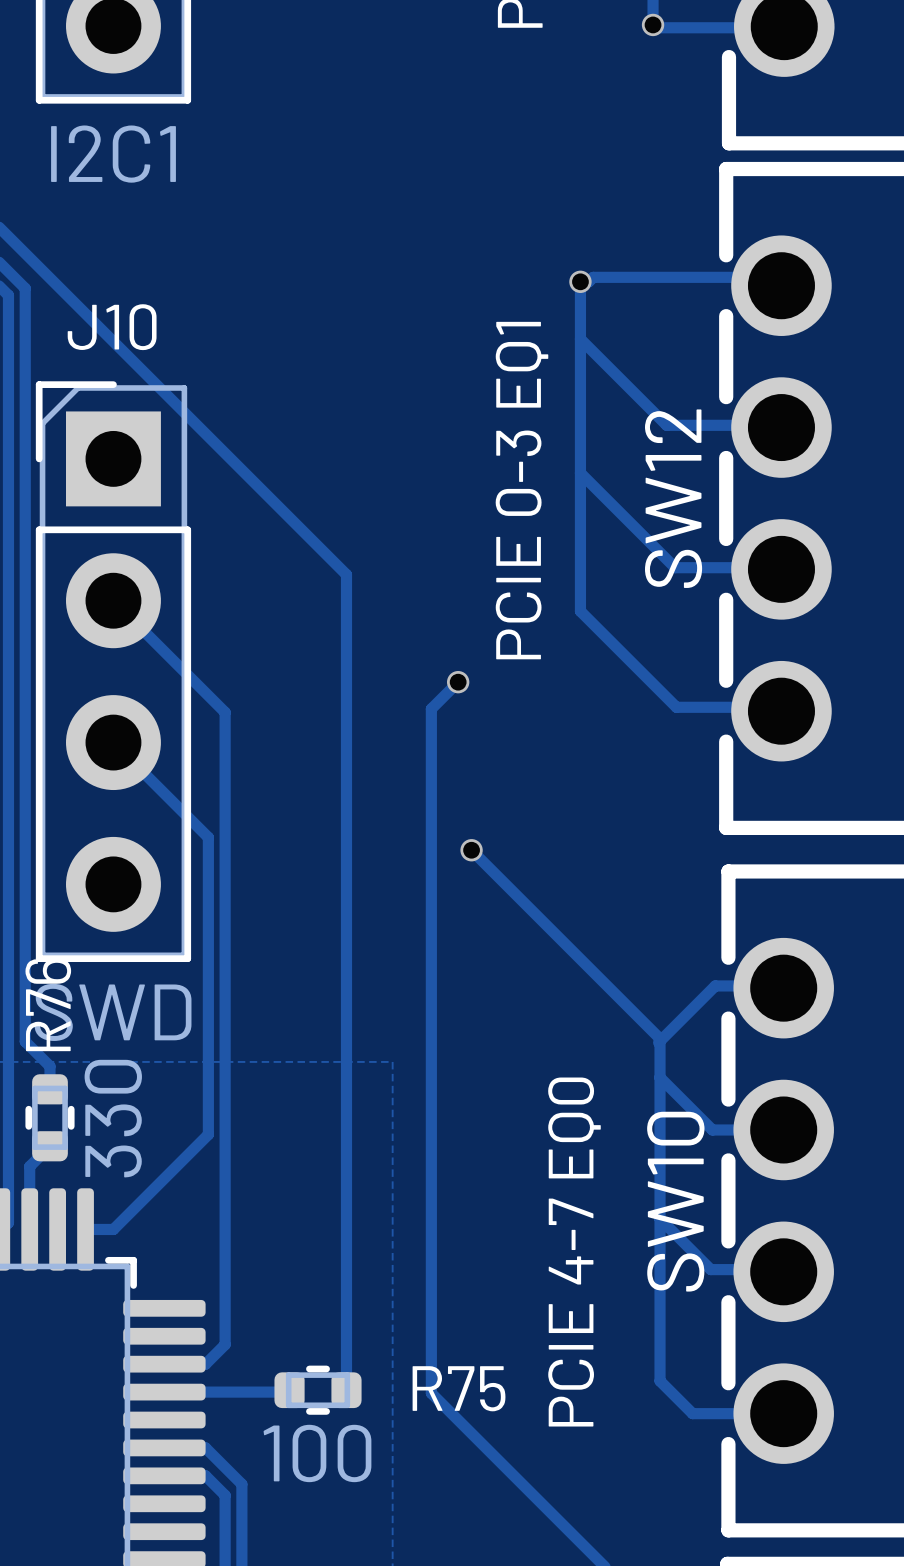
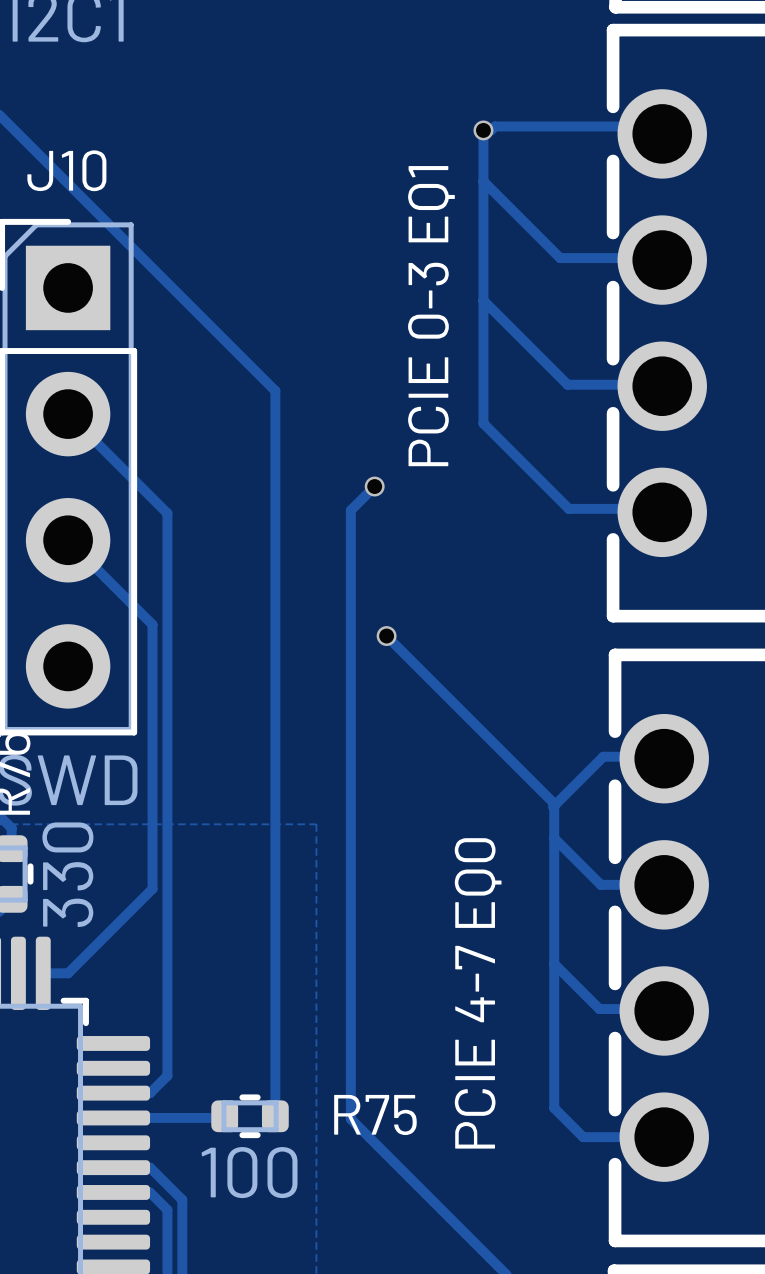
SW12 name: SW12 (673, 498) -> none
SW10 name: SW10 (675, 1201) -> none

